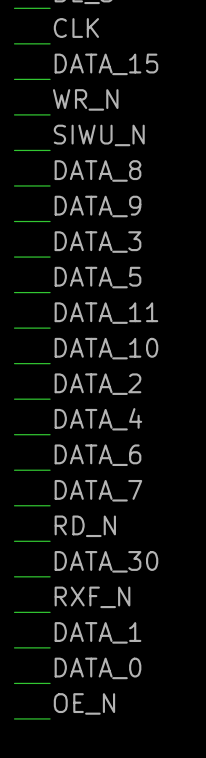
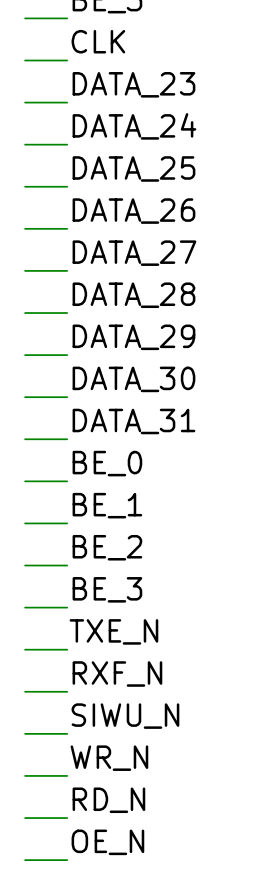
label: DATA_15 (106, 64) -> DATA_23 (133, 84)
label: WR_N (85, 99) -> DATA_24 (134, 126)
label: SIWU_N (99, 135) -> DATA_25 (133, 168)
label: DATA_8 (97, 170) -> DATA_26 (133, 211)
label: DATA_9 (97, 206) -> DATA_27 (134, 253)
label: DATA_3 (97, 242) -> DATA_28 (133, 295)
label: DATA_5 (97, 277) -> DATA_29 (133, 337)
label: DATA_11 (106, 313) -> DATA_30 (133, 379)
label: DATA_10 (106, 348) -> DATA_31 (133, 421)
label: DATA_2 (97, 384) -> BE_0 (107, 463)
label: DATA_4 (98, 419) -> BE_1 (107, 505)
label: DATA_6 (97, 455) -> BE_2 (107, 547)
label: DATA_7 (98, 490) -> BE_3 (107, 589)
label: RD_N (85, 526) -> TXE_N (113, 631)
label: DATA_30 (106, 561) -> RXF_N (117, 674)
label: RXF_N (92, 597) -> SIWU_N (125, 716)
label: DATA_1 (97, 632) -> WR_N (109, 758)
label: DATA_0 (97, 668) -> RD_N (108, 800)

